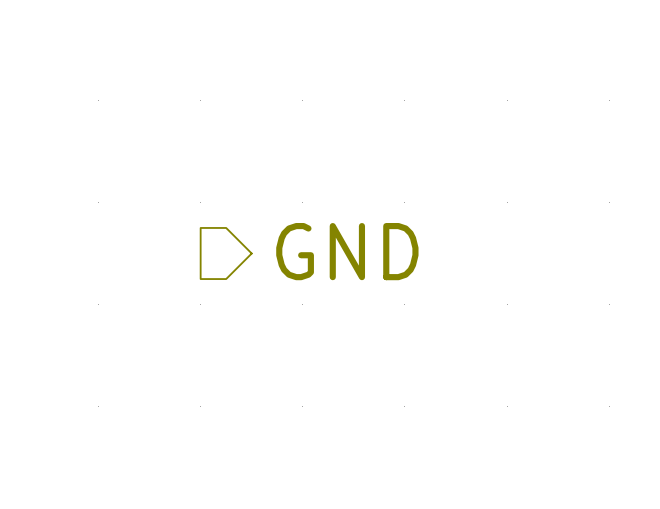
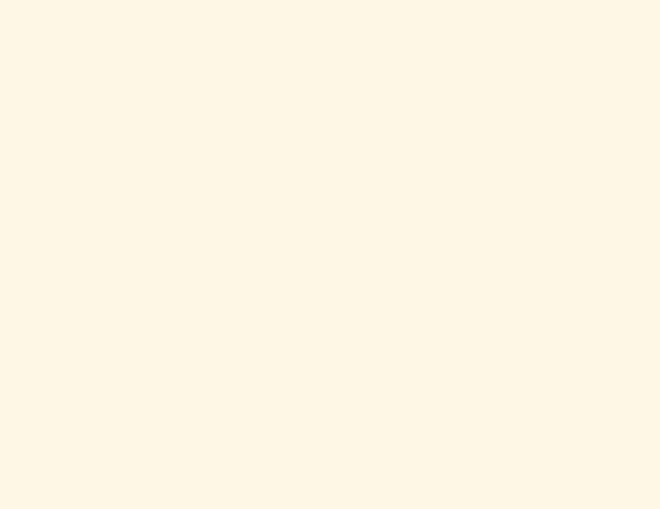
hierarchical label: GND (347, 251) -> none

